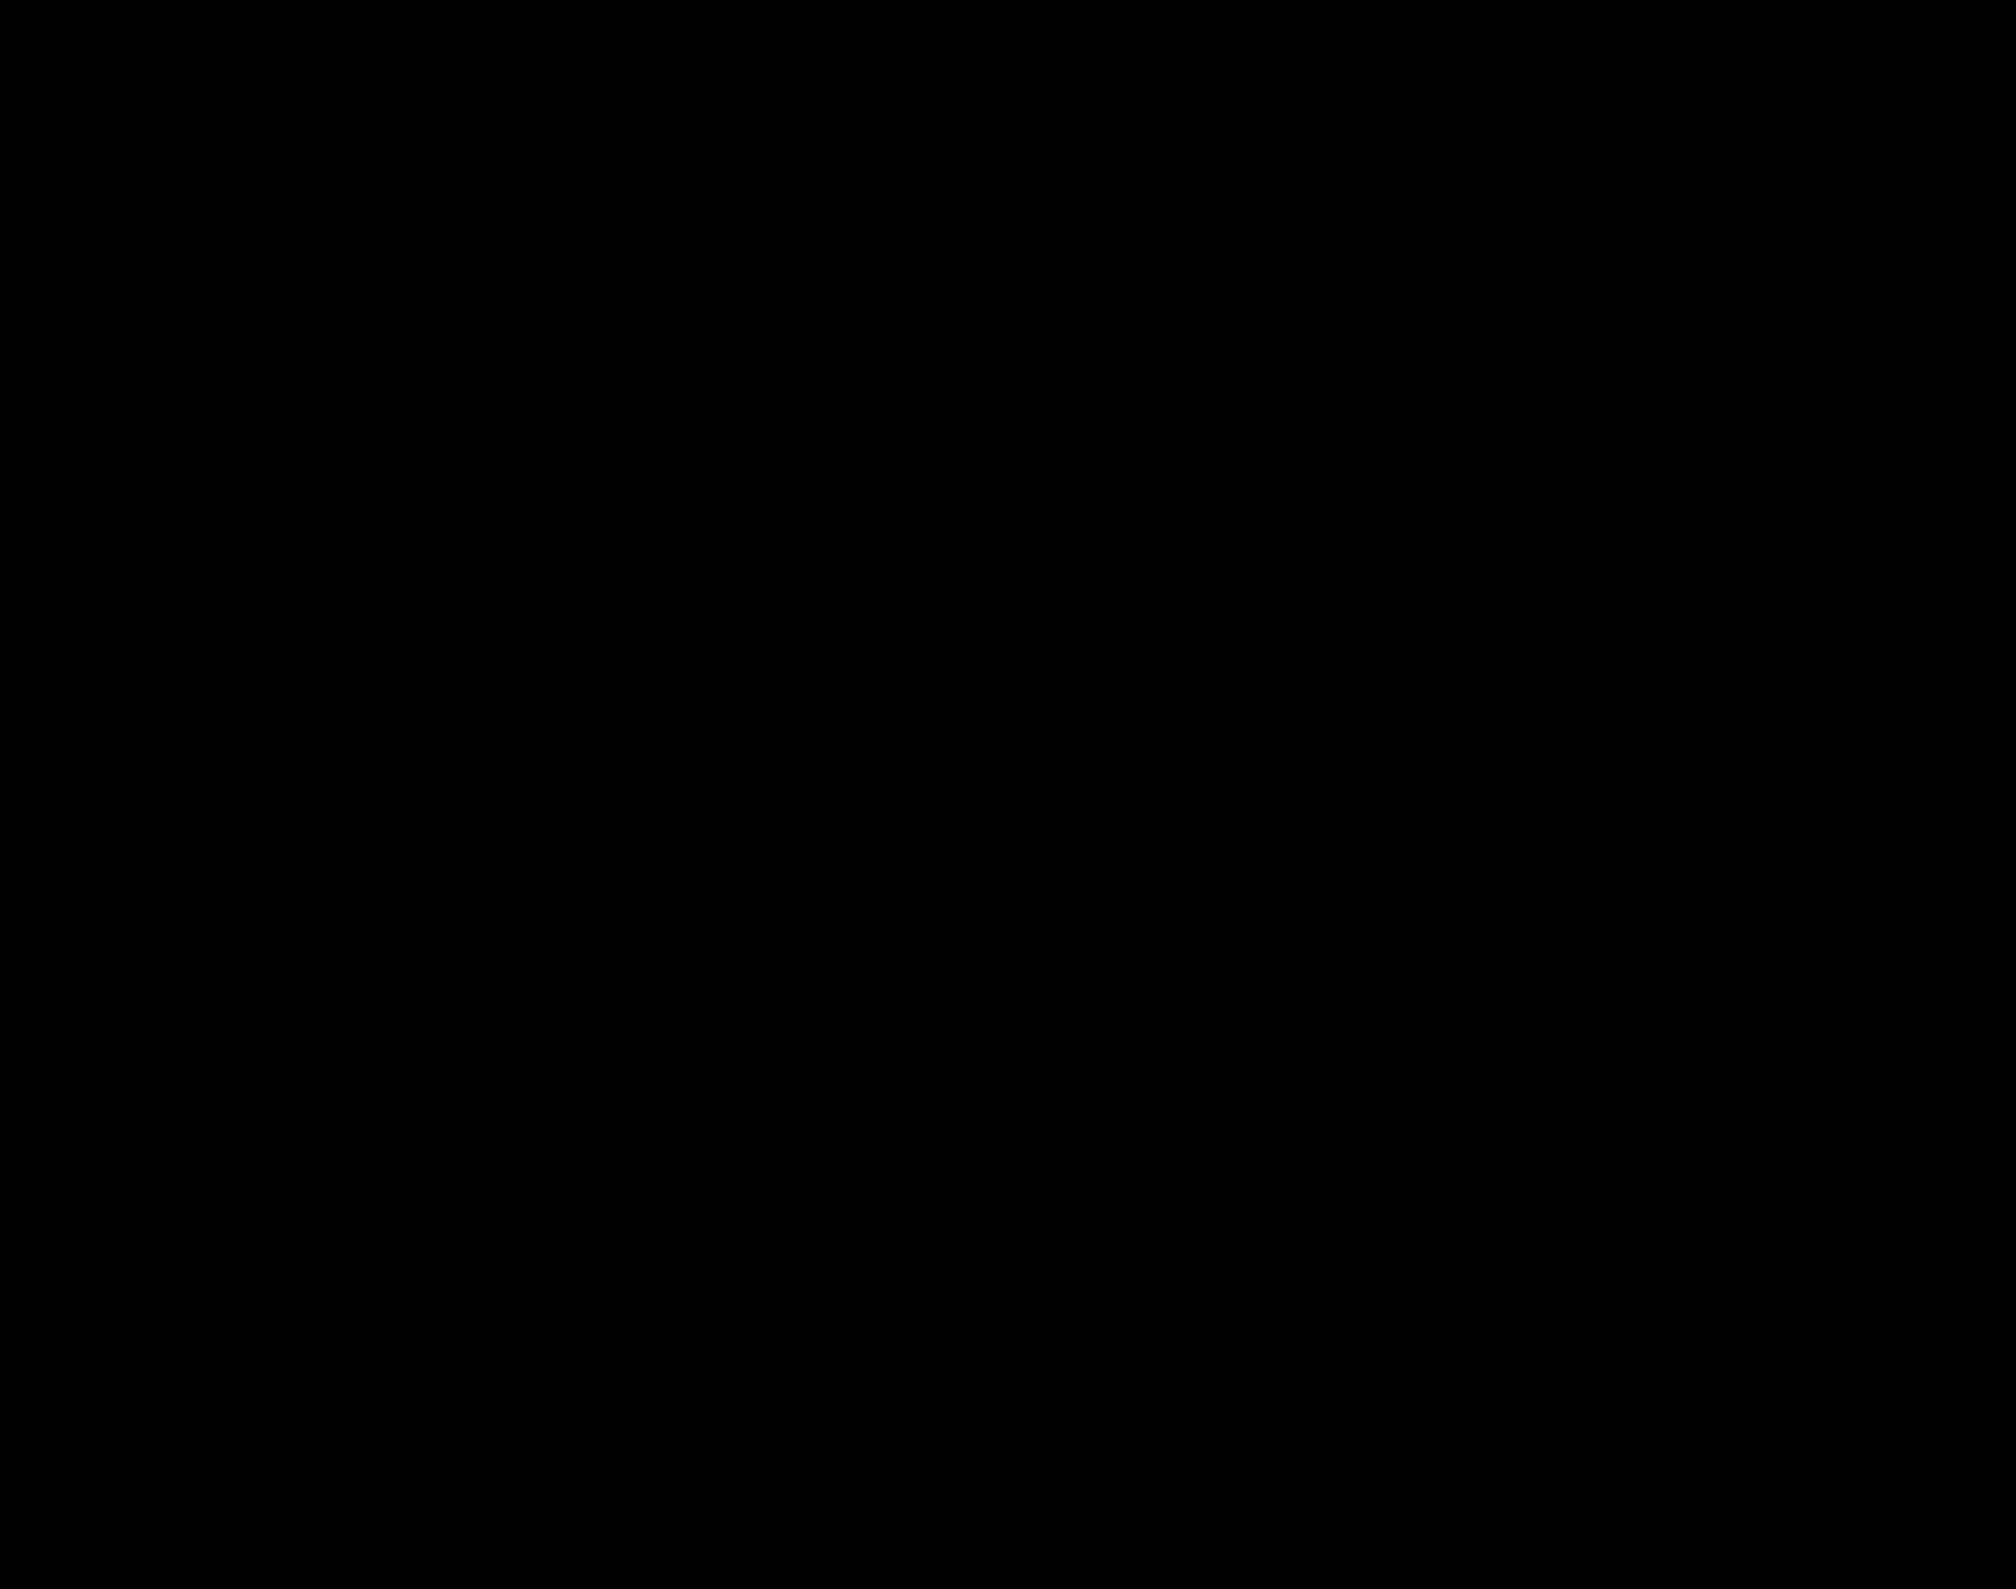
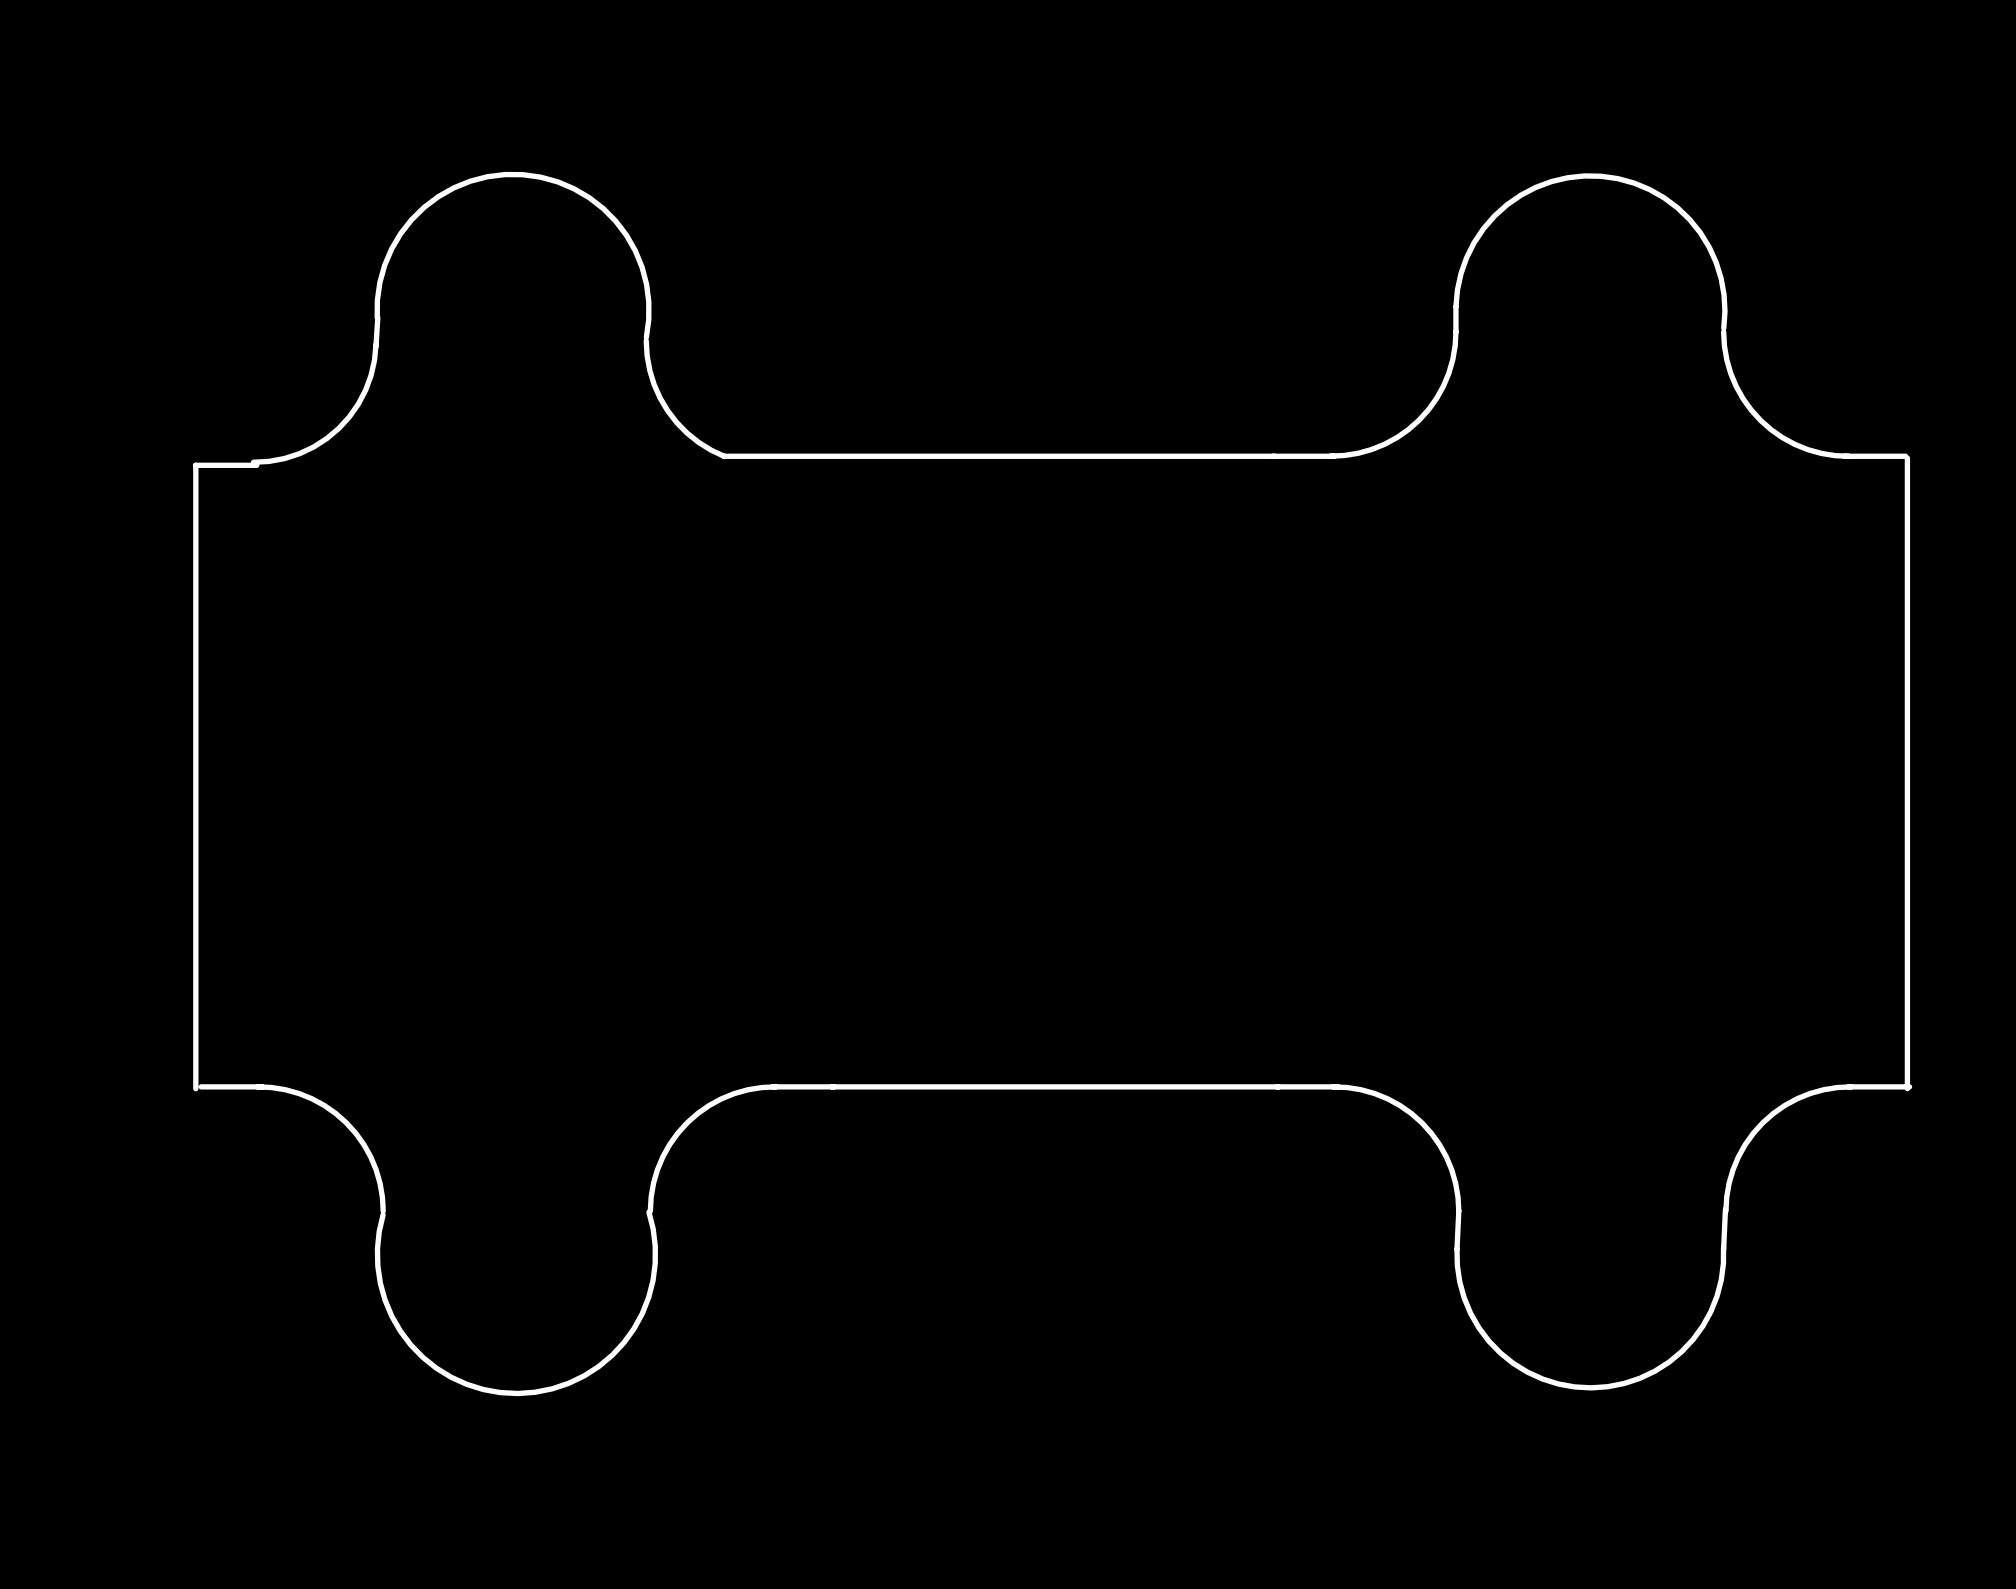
board edge: none -> (377, 317) (376, 346)
board edge: none -> (377, 317) (379, 282) (391, 249) (411, 219) (424, 207) (438, 196) (470, 181) (505, 174) (522, 174) (557, 181) (573, 188) (589, 197) (615, 221) (635, 250) (646, 284) (648, 302) (646, 337)
board edge: none -> (1723, 328) (1724, 294) (1716, 262) (1700, 232) (1677, 207) (1649, 189) (1617, 178) (1584, 175) (1551, 181) (1535, 187) (1507, 204) (1494, 215) (1474, 242) (1466, 257) (1457, 289) (1452, 359) (1443, 386) (1428, 409) (1408, 429) (1384, 444) (1358, 453) (1330, 456)
board edge: none -> (1723, 331) (1726, 359) (1736, 386) (1742, 398) (1760, 420) (1782, 437) (1807, 449) (1821, 453) (1849, 456)
board edge: none -> (646, 340) (649, 370) (660, 398) (667, 410) (687, 433) (698, 442) (724, 456)
board edge: none -> (376, 344) (371, 375) (365, 390) (358, 404) (338, 428) (326, 438) (299, 453) (284, 458) (253, 462)
board edge: none -> (1334, 456) (723, 456)
board edge: none -> (1905, 456) (1844, 456)
board edge: none -> (1907, 458) (1907, 1088)
board edge: none -> (195, 465) (195, 1088)
board edge: none -> (256, 465) (195, 465)
board edge: none -> (257, 1086) (271, 1087) (298, 1093) (324, 1105) (346, 1122) (363, 1144) (370, 1156) (380, 1183) (383, 1211)
board edge: none -> (262, 1086) (201, 1086)
board edge: none -> (775, 1086) (761, 1087) (734, 1093) (709, 1105) (687, 1122) (669, 1144) (662, 1156) (653, 1183) (650, 1211)
board edge: none -> (1333, 1086) (1361, 1089) (1387, 1098) (1411, 1113) (1431, 1133) (1446, 1156) (1455, 1183) (1458, 1211) (1457, 1265) (1464, 1298) (1470, 1313) (1488, 1341) (1500, 1353) (1513, 1363) (1542, 1379) (1574, 1386) (1607, 1386) (1640, 1378) (1668, 1362) (1693, 1339) (1710, 1311) (1721, 1280) (1723, 1246)
board edge: none -> (1338, 1086) (772, 1086)
board edge: none -> (1851, 1086) (1837, 1087) (1810, 1093) (1784, 1105) (1762, 1122) (1745, 1144) (1738, 1156) (1729, 1183) (1725, 1211)
board edge: none -> (1909, 1086) (1848, 1086)
board edge: none -> (1725, 1209) (1723, 1249)
board edge: none -> (648, 1212) (655, 1246) (653, 1280) (642, 1313) (634, 1328) (612, 1355) (584, 1375) (552, 1388) (517, 1393) (483, 1389) (451, 1377) (422, 1357) (400, 1331) (385, 1300) (377, 1266) (377, 1248) (383, 1214)

